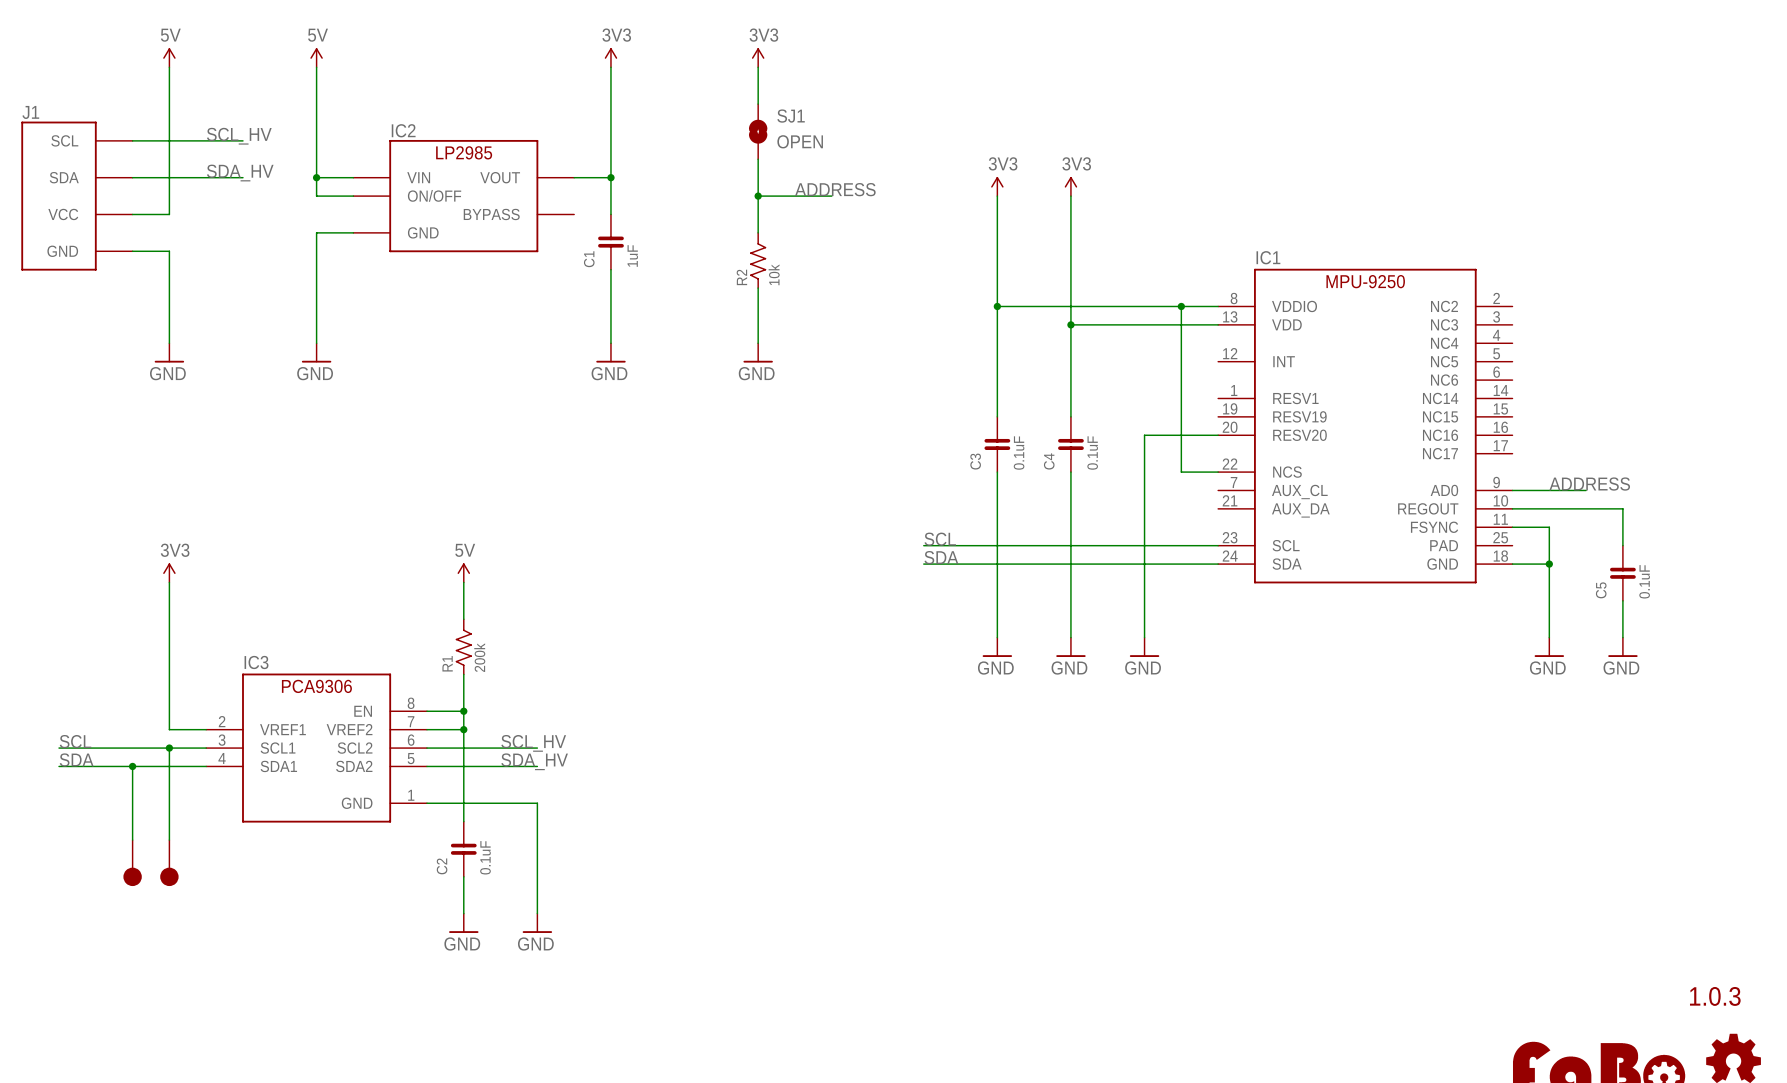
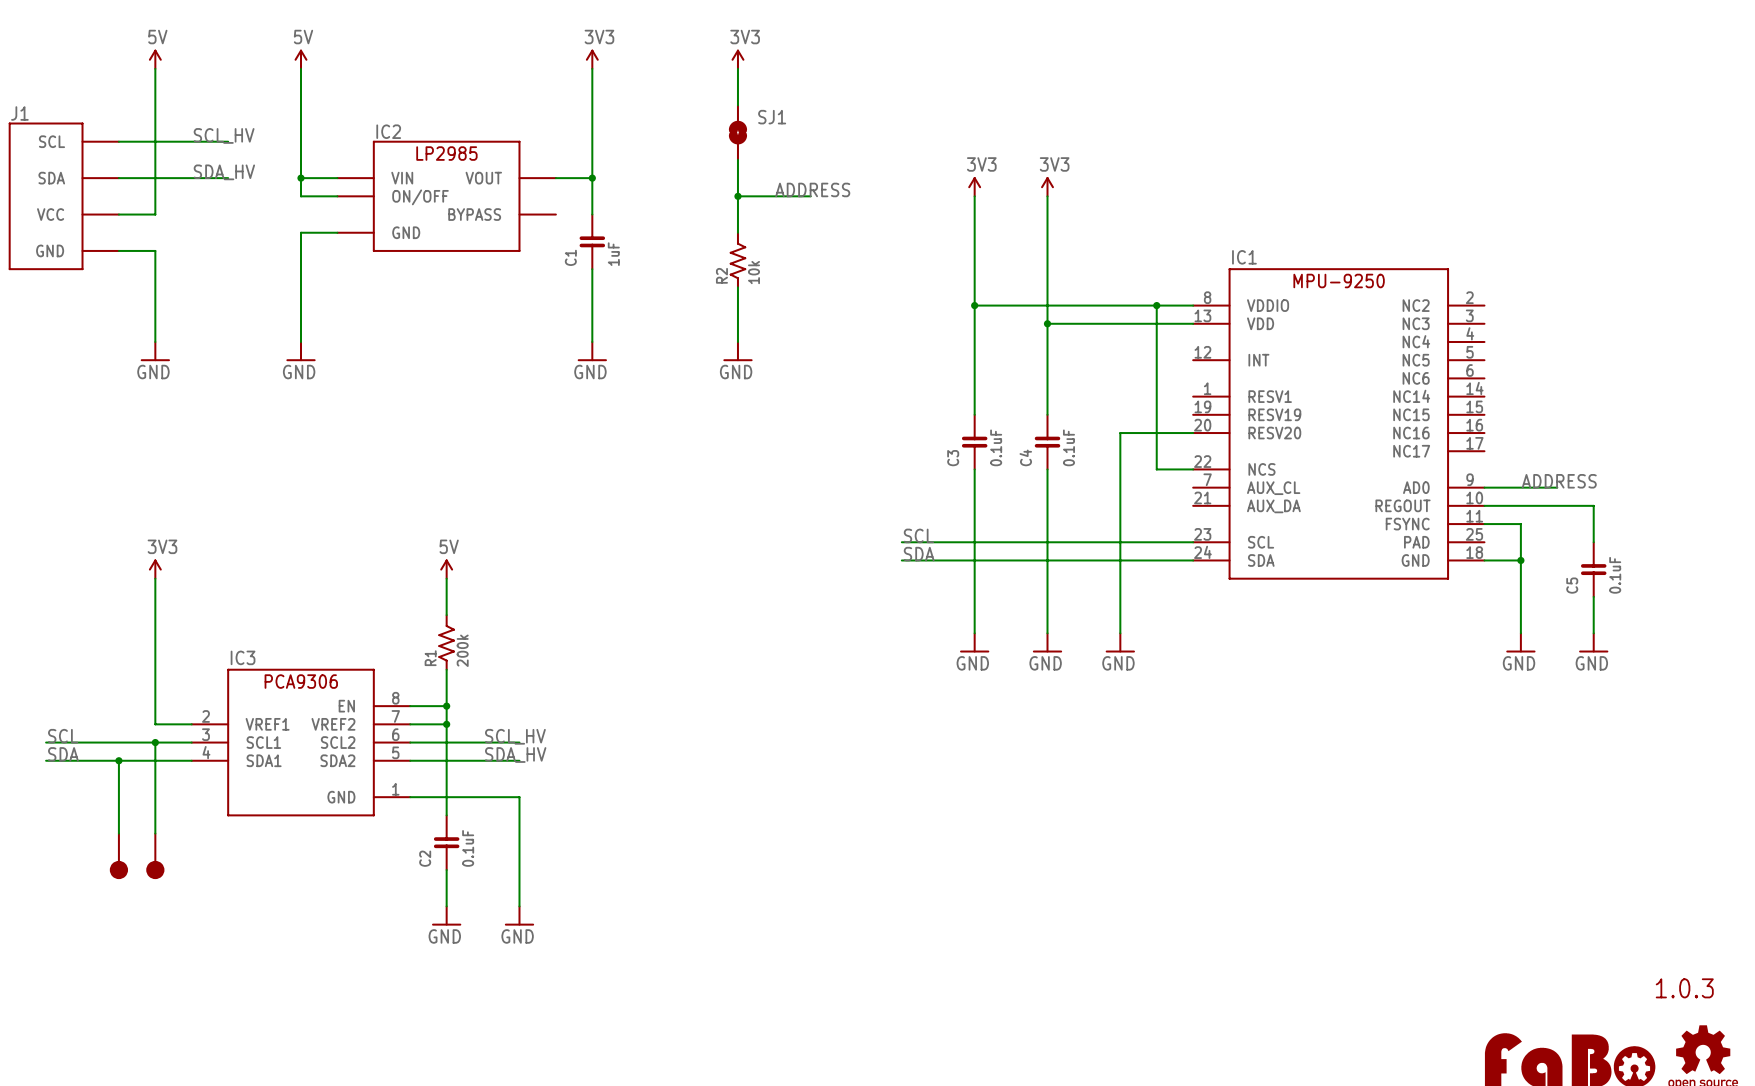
SJ1 value: OPEN (800, 141) -> none

